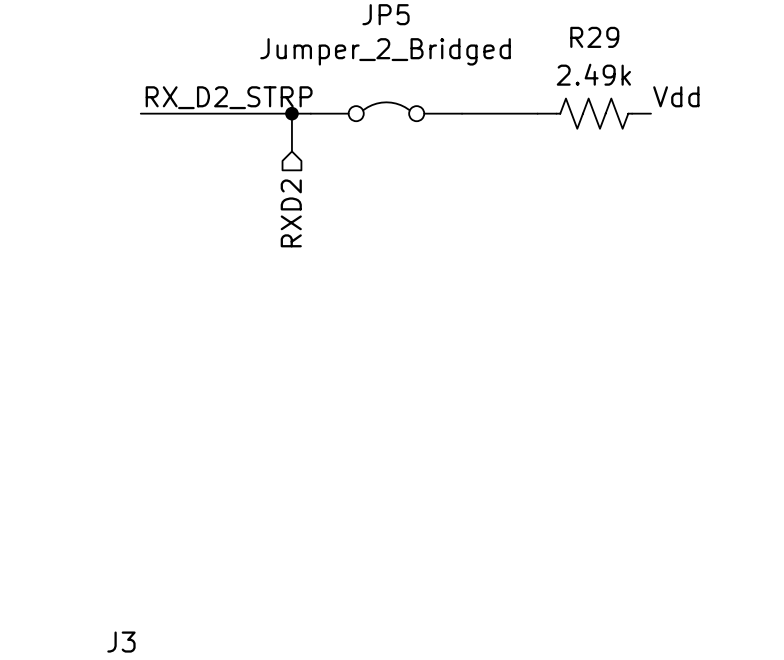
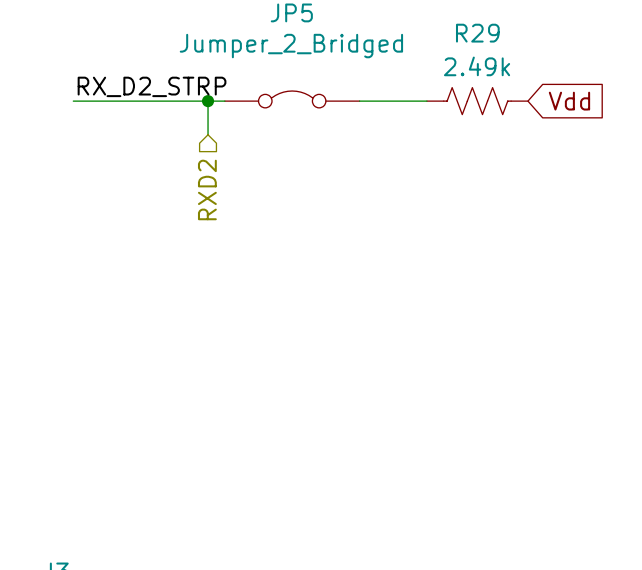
label: Vdd (676, 96) -> none
global label: none -> Vdd (569, 101)

